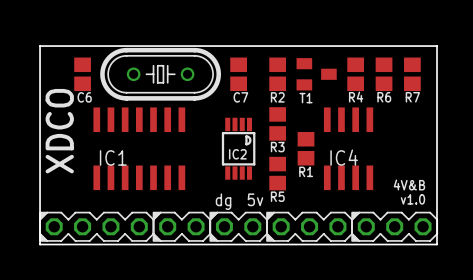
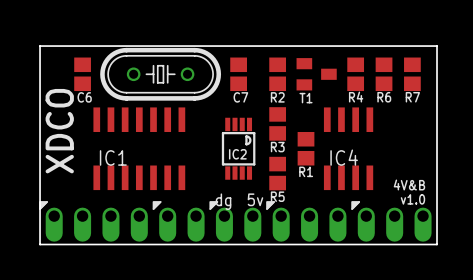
part footprint: [39, 211, 155, 242] -> [39, 201, 148, 242]
part footprint: [152, 211, 212, 242] -> [152, 201, 205, 242]
part footprint: [209, 211, 268, 242] -> [209, 201, 262, 242]
part footprint: [266, 211, 353, 242] -> [266, 201, 347, 242]
part footprint: [351, 211, 439, 242] -> [351, 201, 432, 242]

